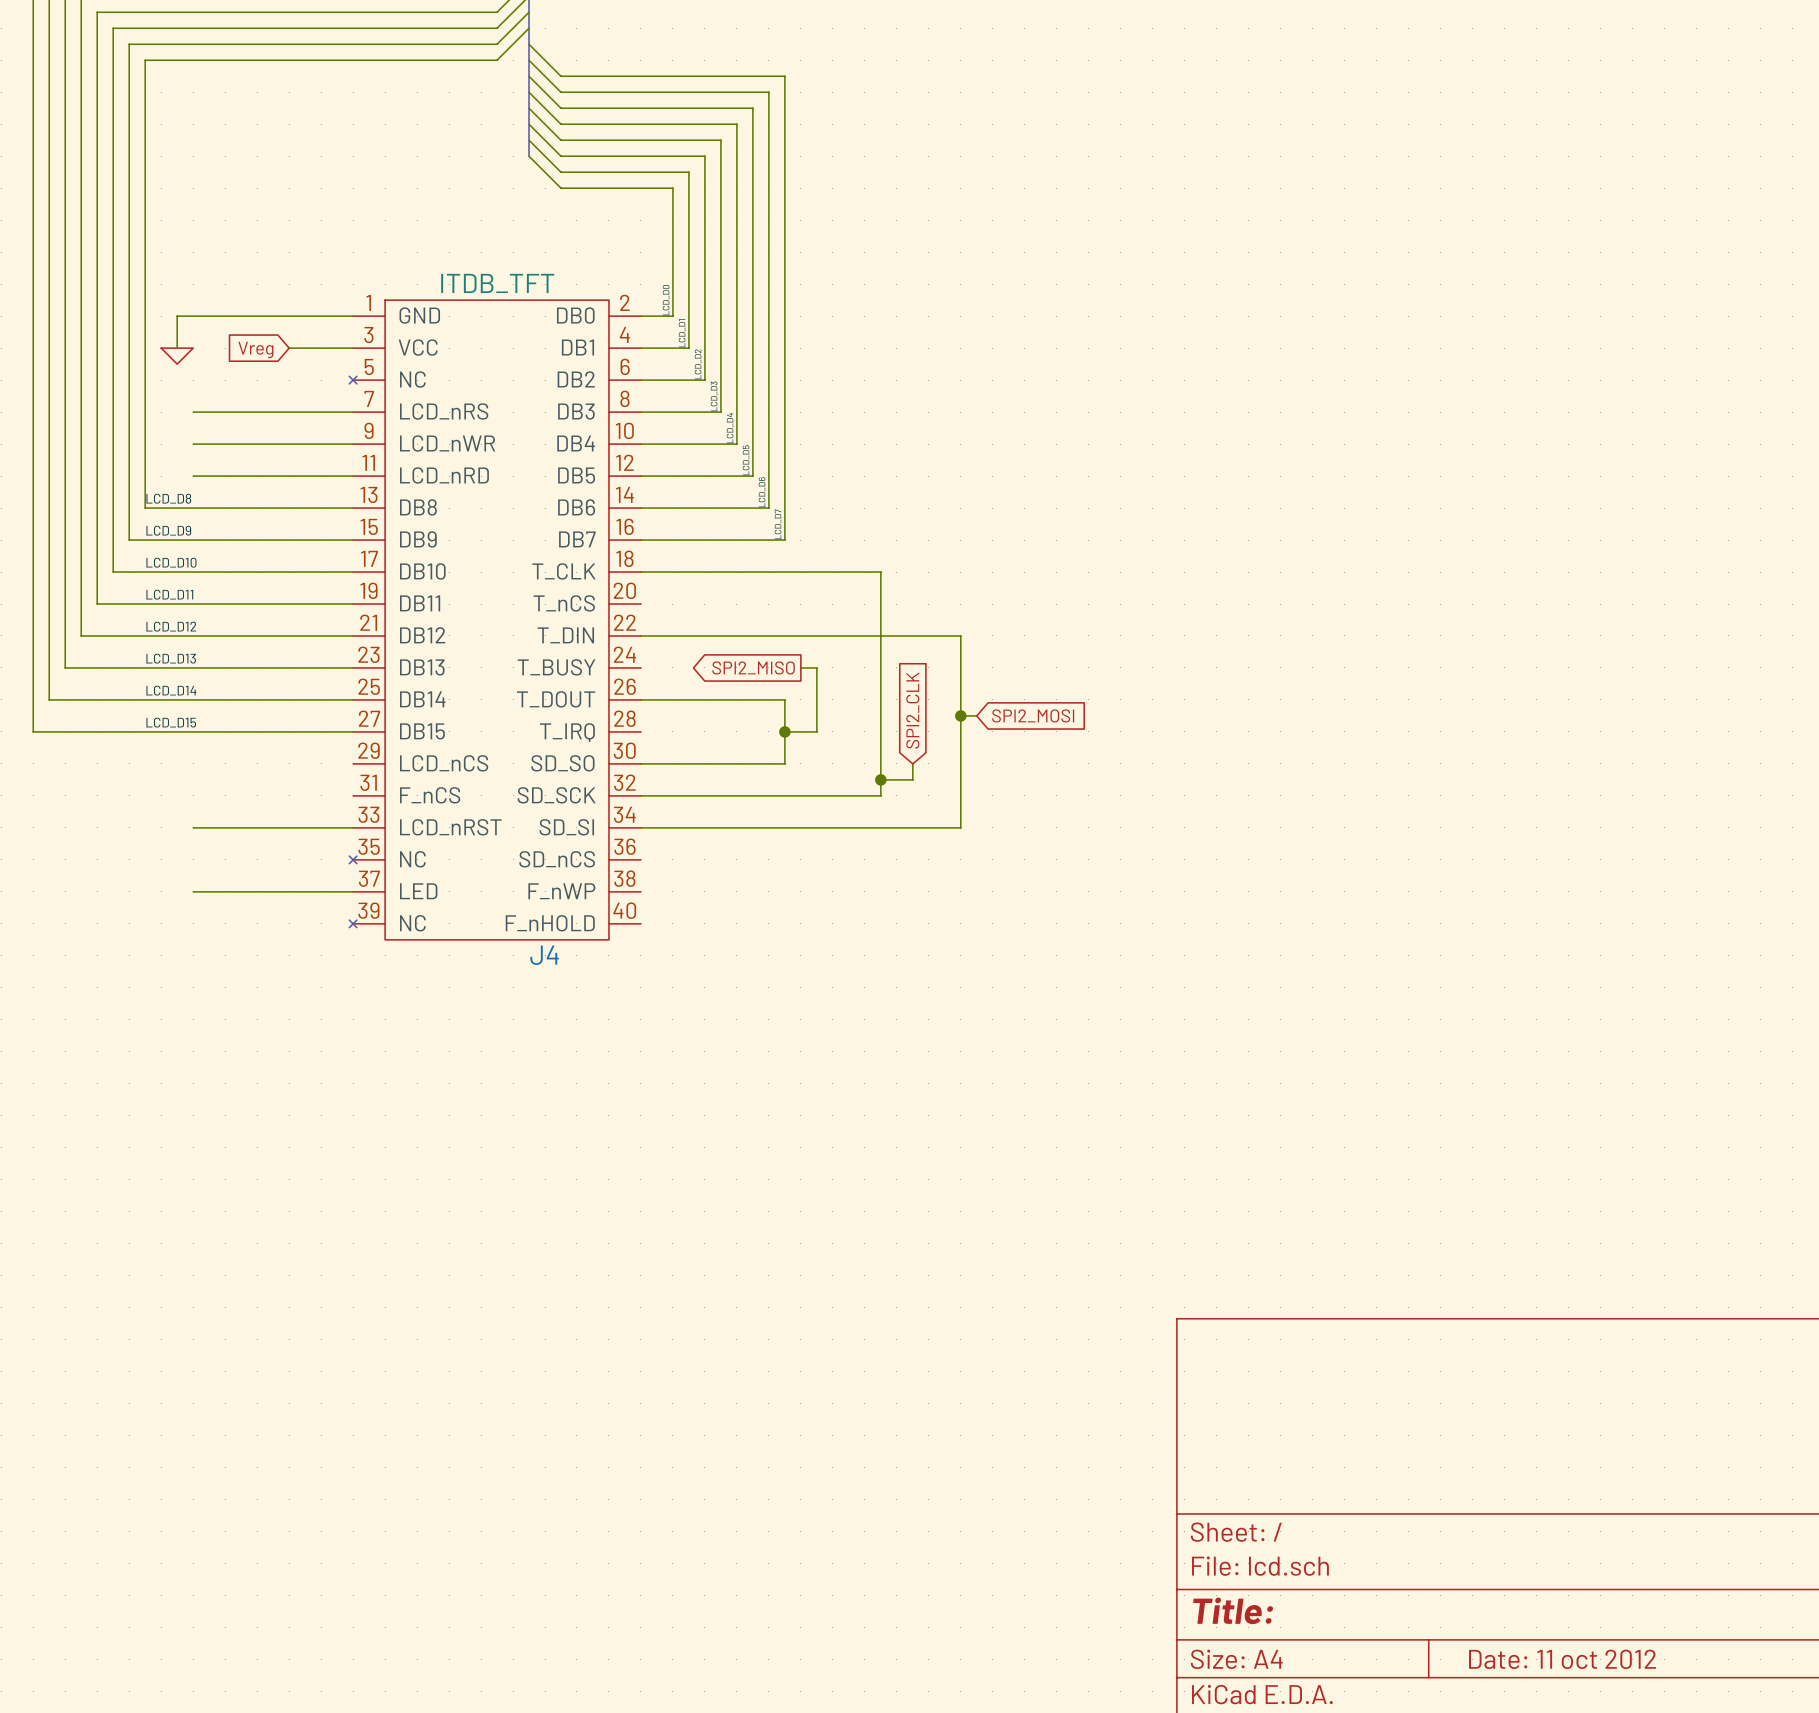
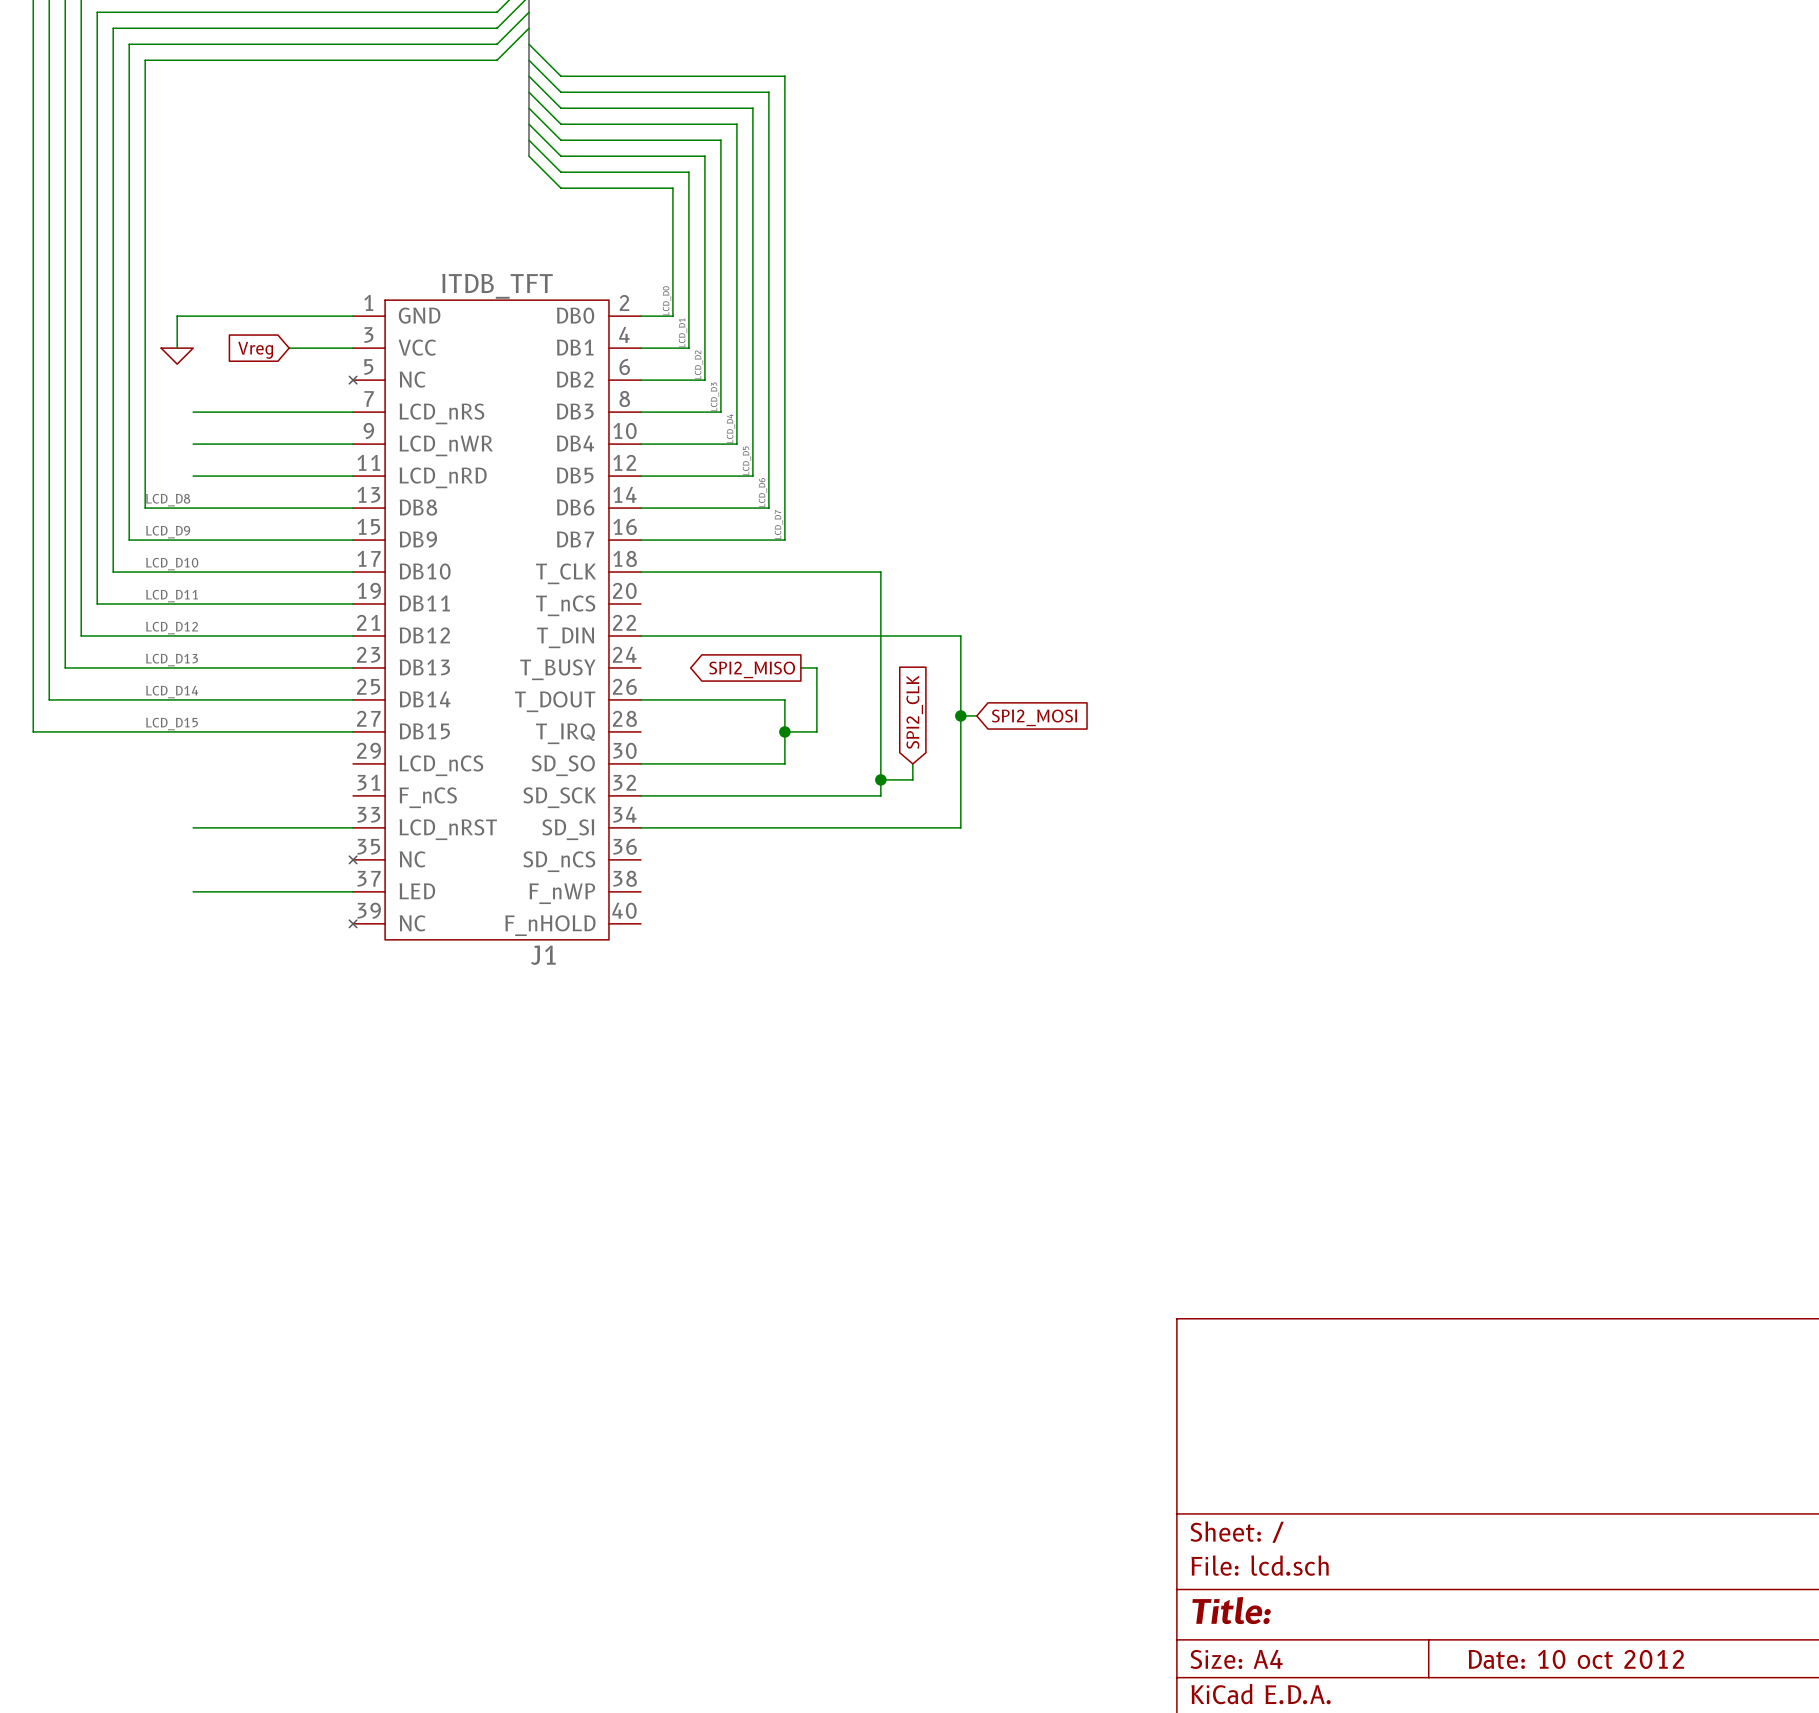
J4 name: J4 (544, 955) -> J1 (543, 955)
title block: Date: 11 oct 2012 (1562, 1659) -> Date: 10 oct 2012 (1576, 1659)

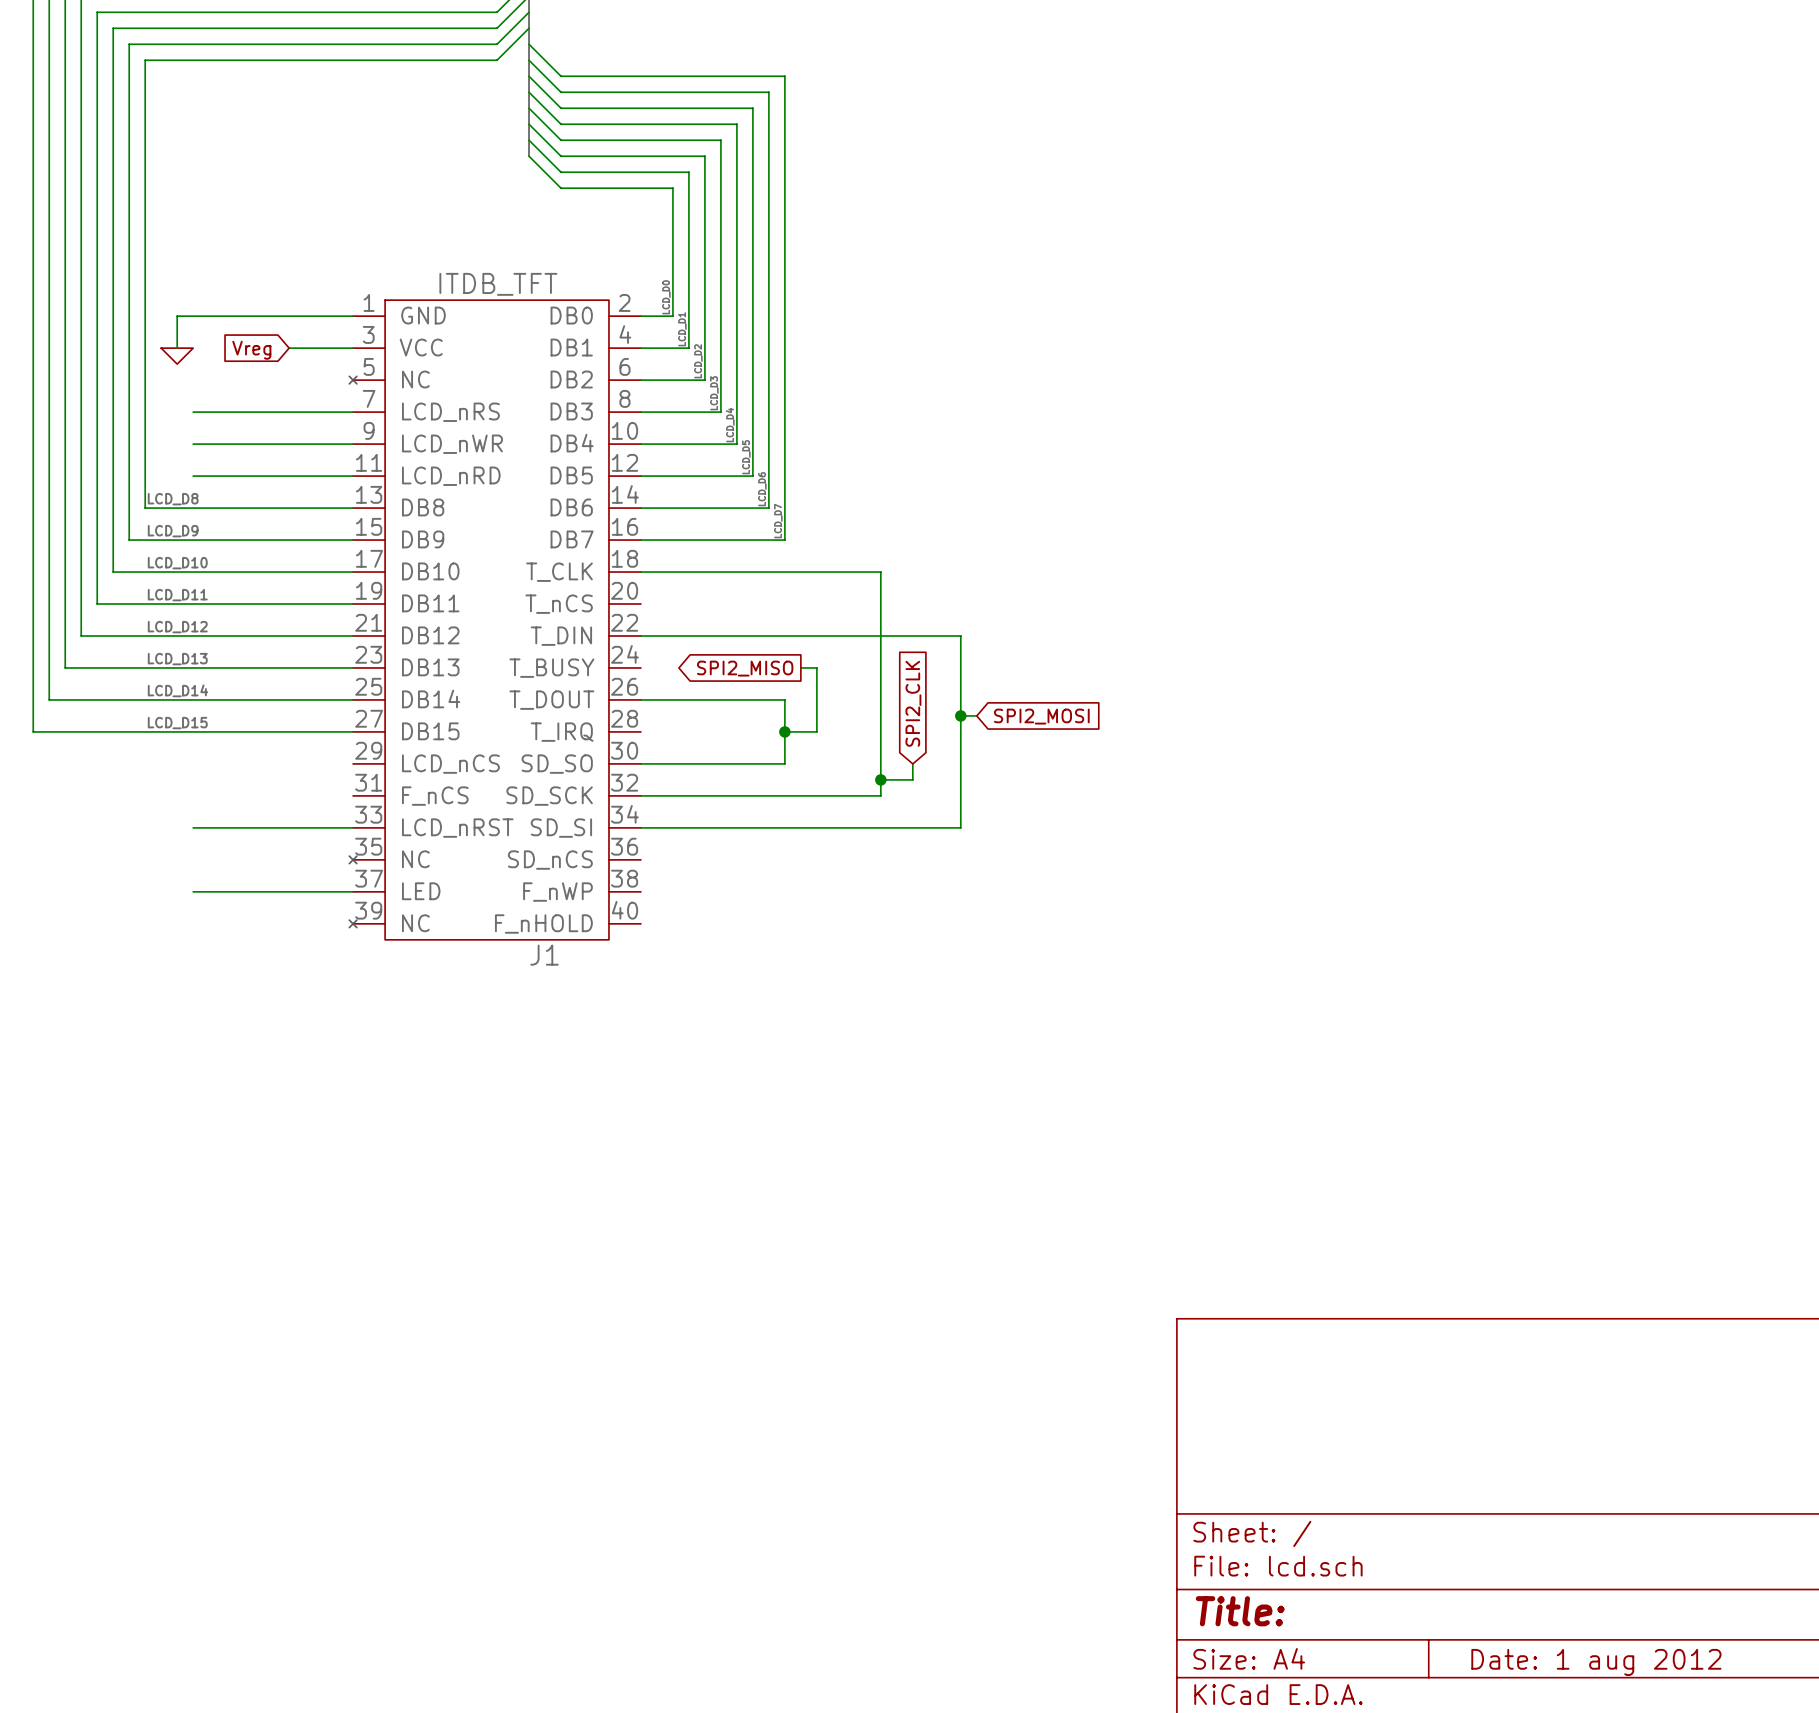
title block: Date: 10 oct 2012 (1576, 1659) -> Date: 1 aug 2012 (1596, 1662)

